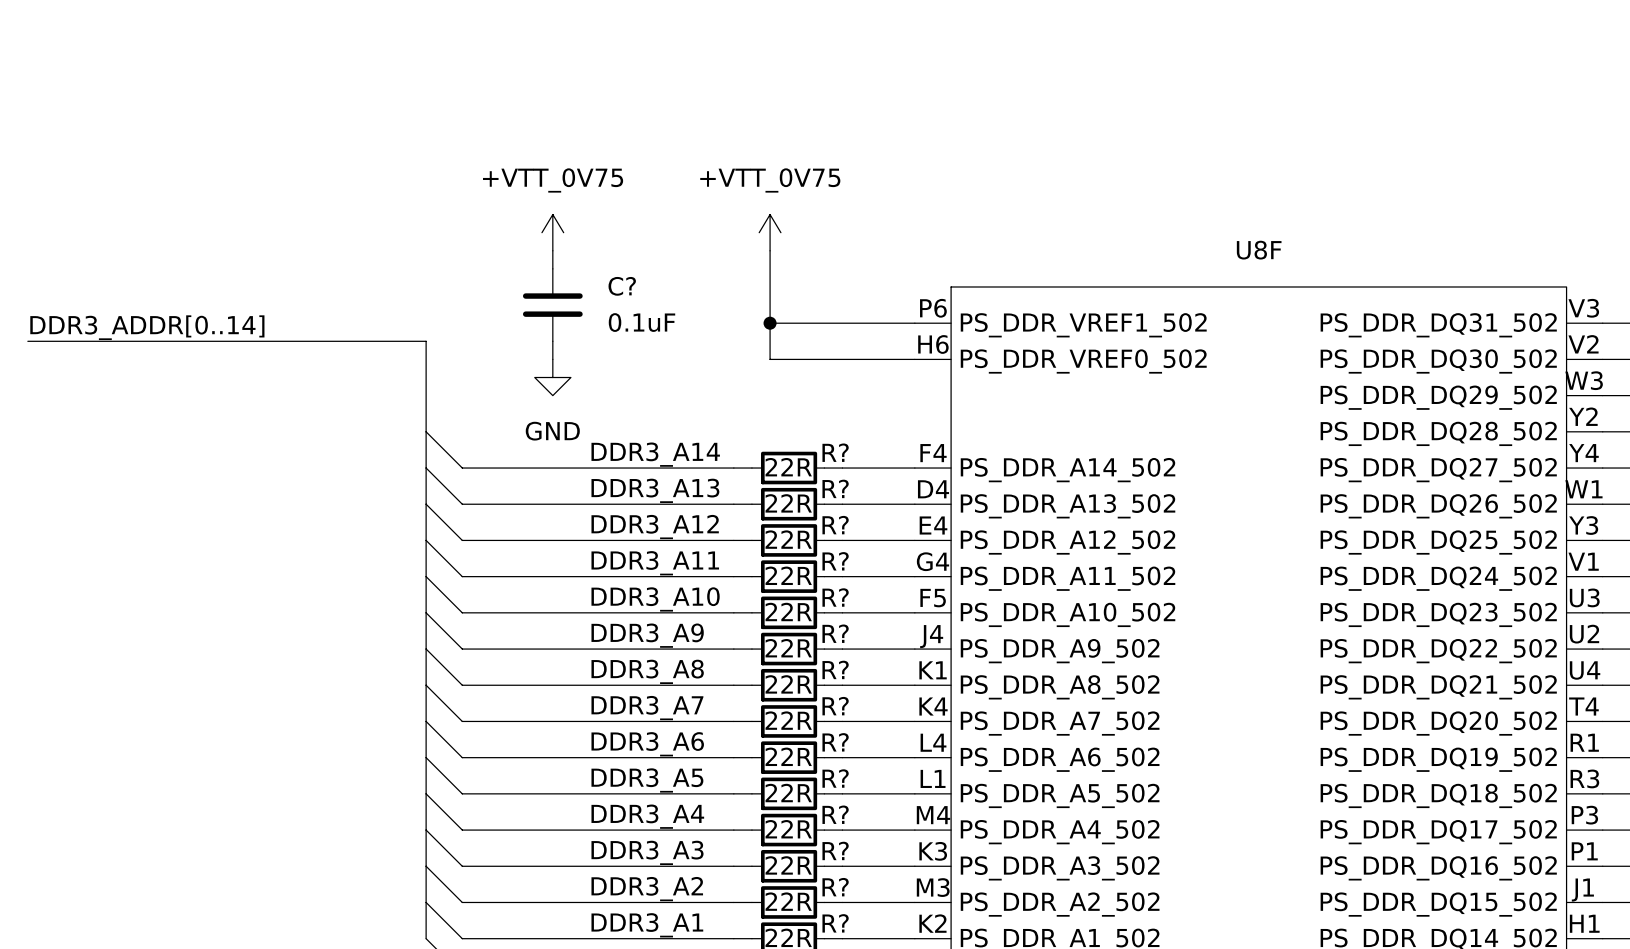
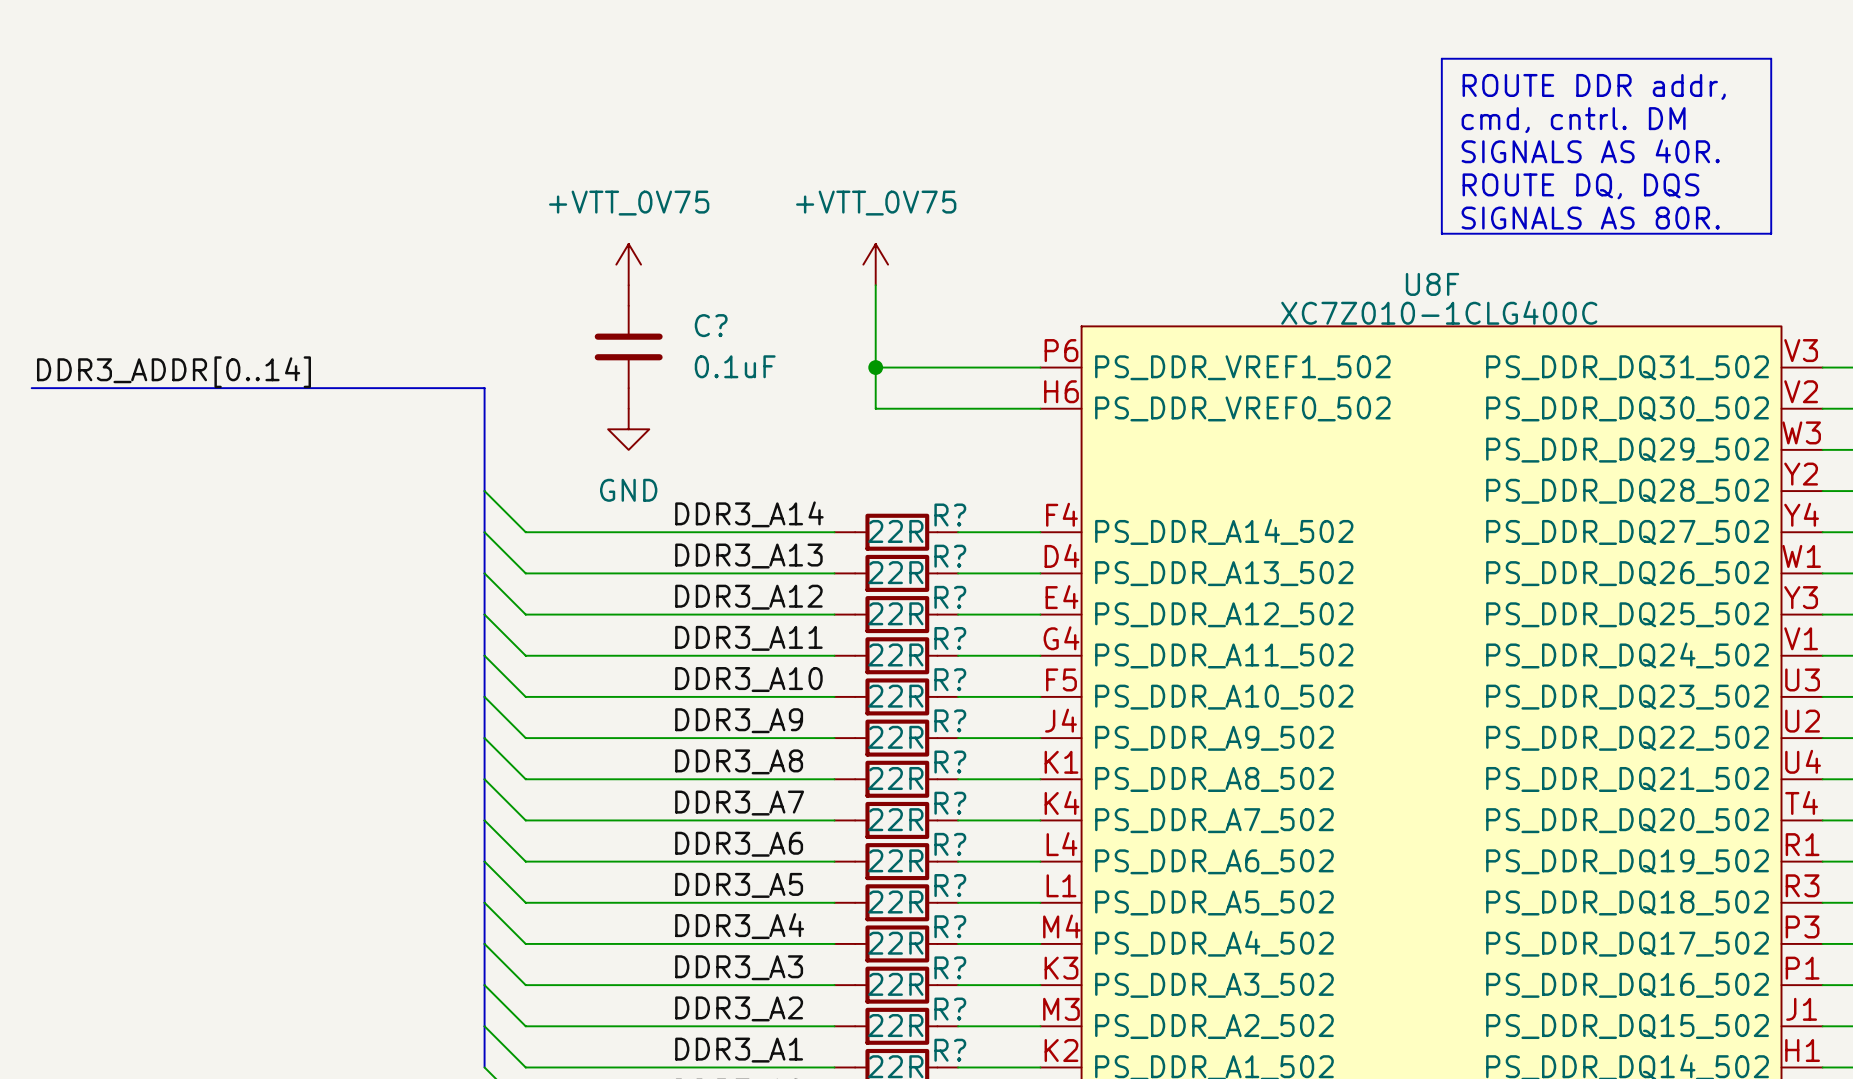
line: none -> (1441, 58) (1771, 58) (1771, 233) (1441, 233) (1441, 58)
text: none -> ROUTE DDR addr, (1594, 86)
text: none -> cmd, cntrl. DM (1573, 120)
text: none -> SIGNALS AS 40R. (1590, 151)
text: none -> ROUTE DQ, DQS (1580, 186)
text: none -> SIGNALS AS 80R. (1590, 218)
U8F value: none -> XC7Z010-1CLG400C (1439, 312)

